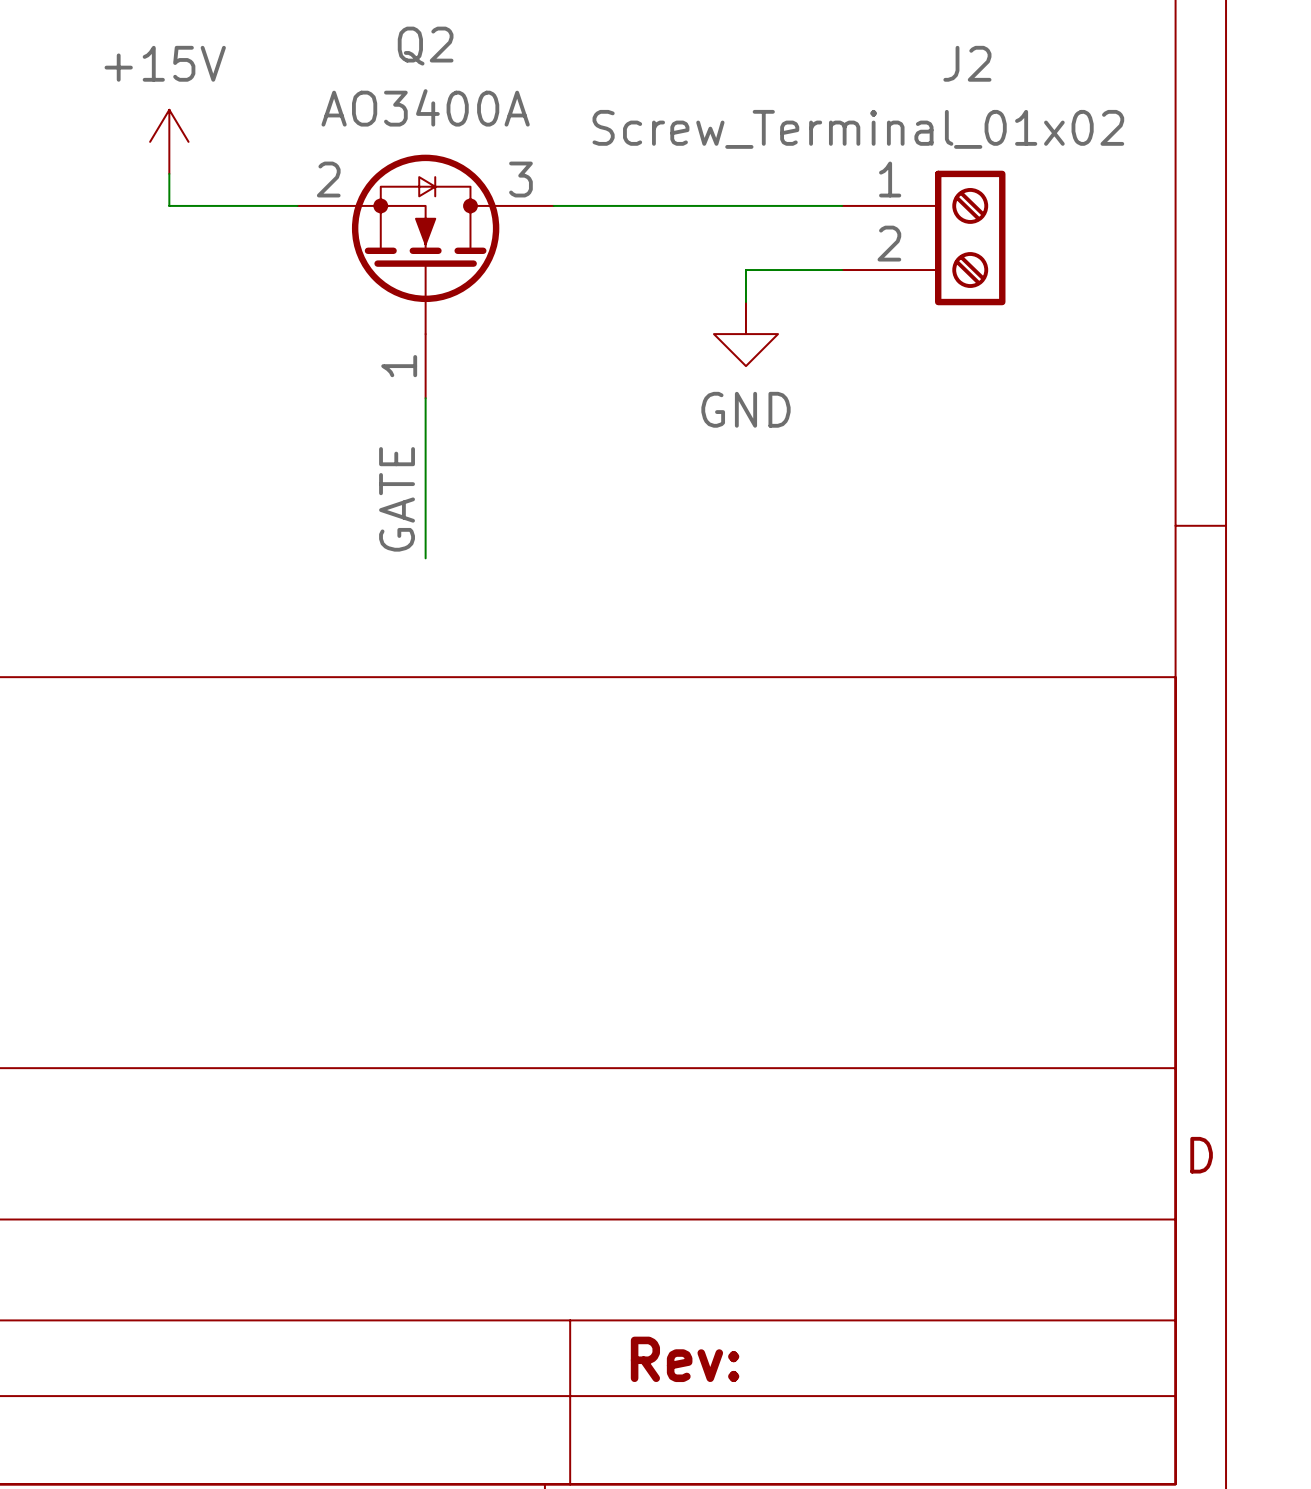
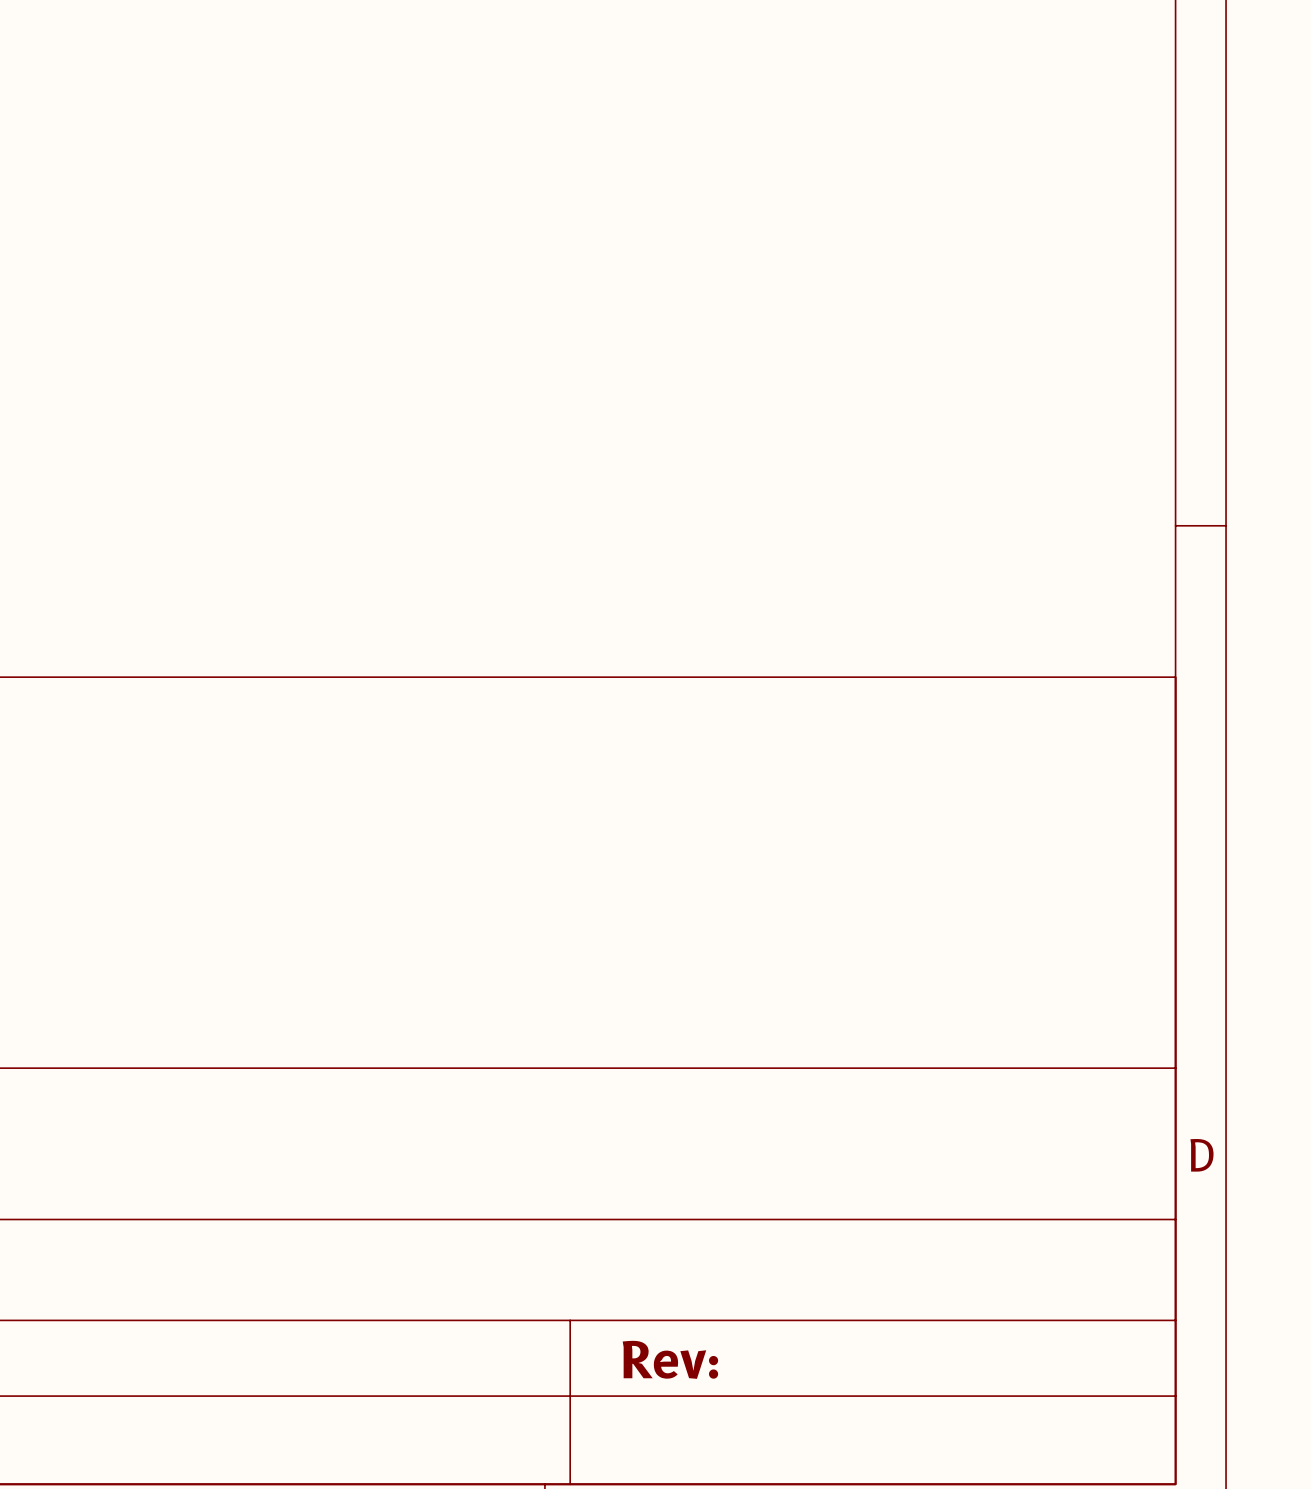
power symbol: +15V (169, 141) -> none
wire: (169, 173) (169, 205) (297, 205) -> none
wire: (553, 205) (842, 205) -> none
J2: Screw_Terminal_01x02 (923, 237) -> none
wire: (842, 270) (745, 270) (745, 302) -> none
Q2: AO3400A (425, 276) -> none
power symbol: GND (745, 334) -> none
wire: (425, 398) (425, 558) -> none
label: GATE (397, 499) -> none

